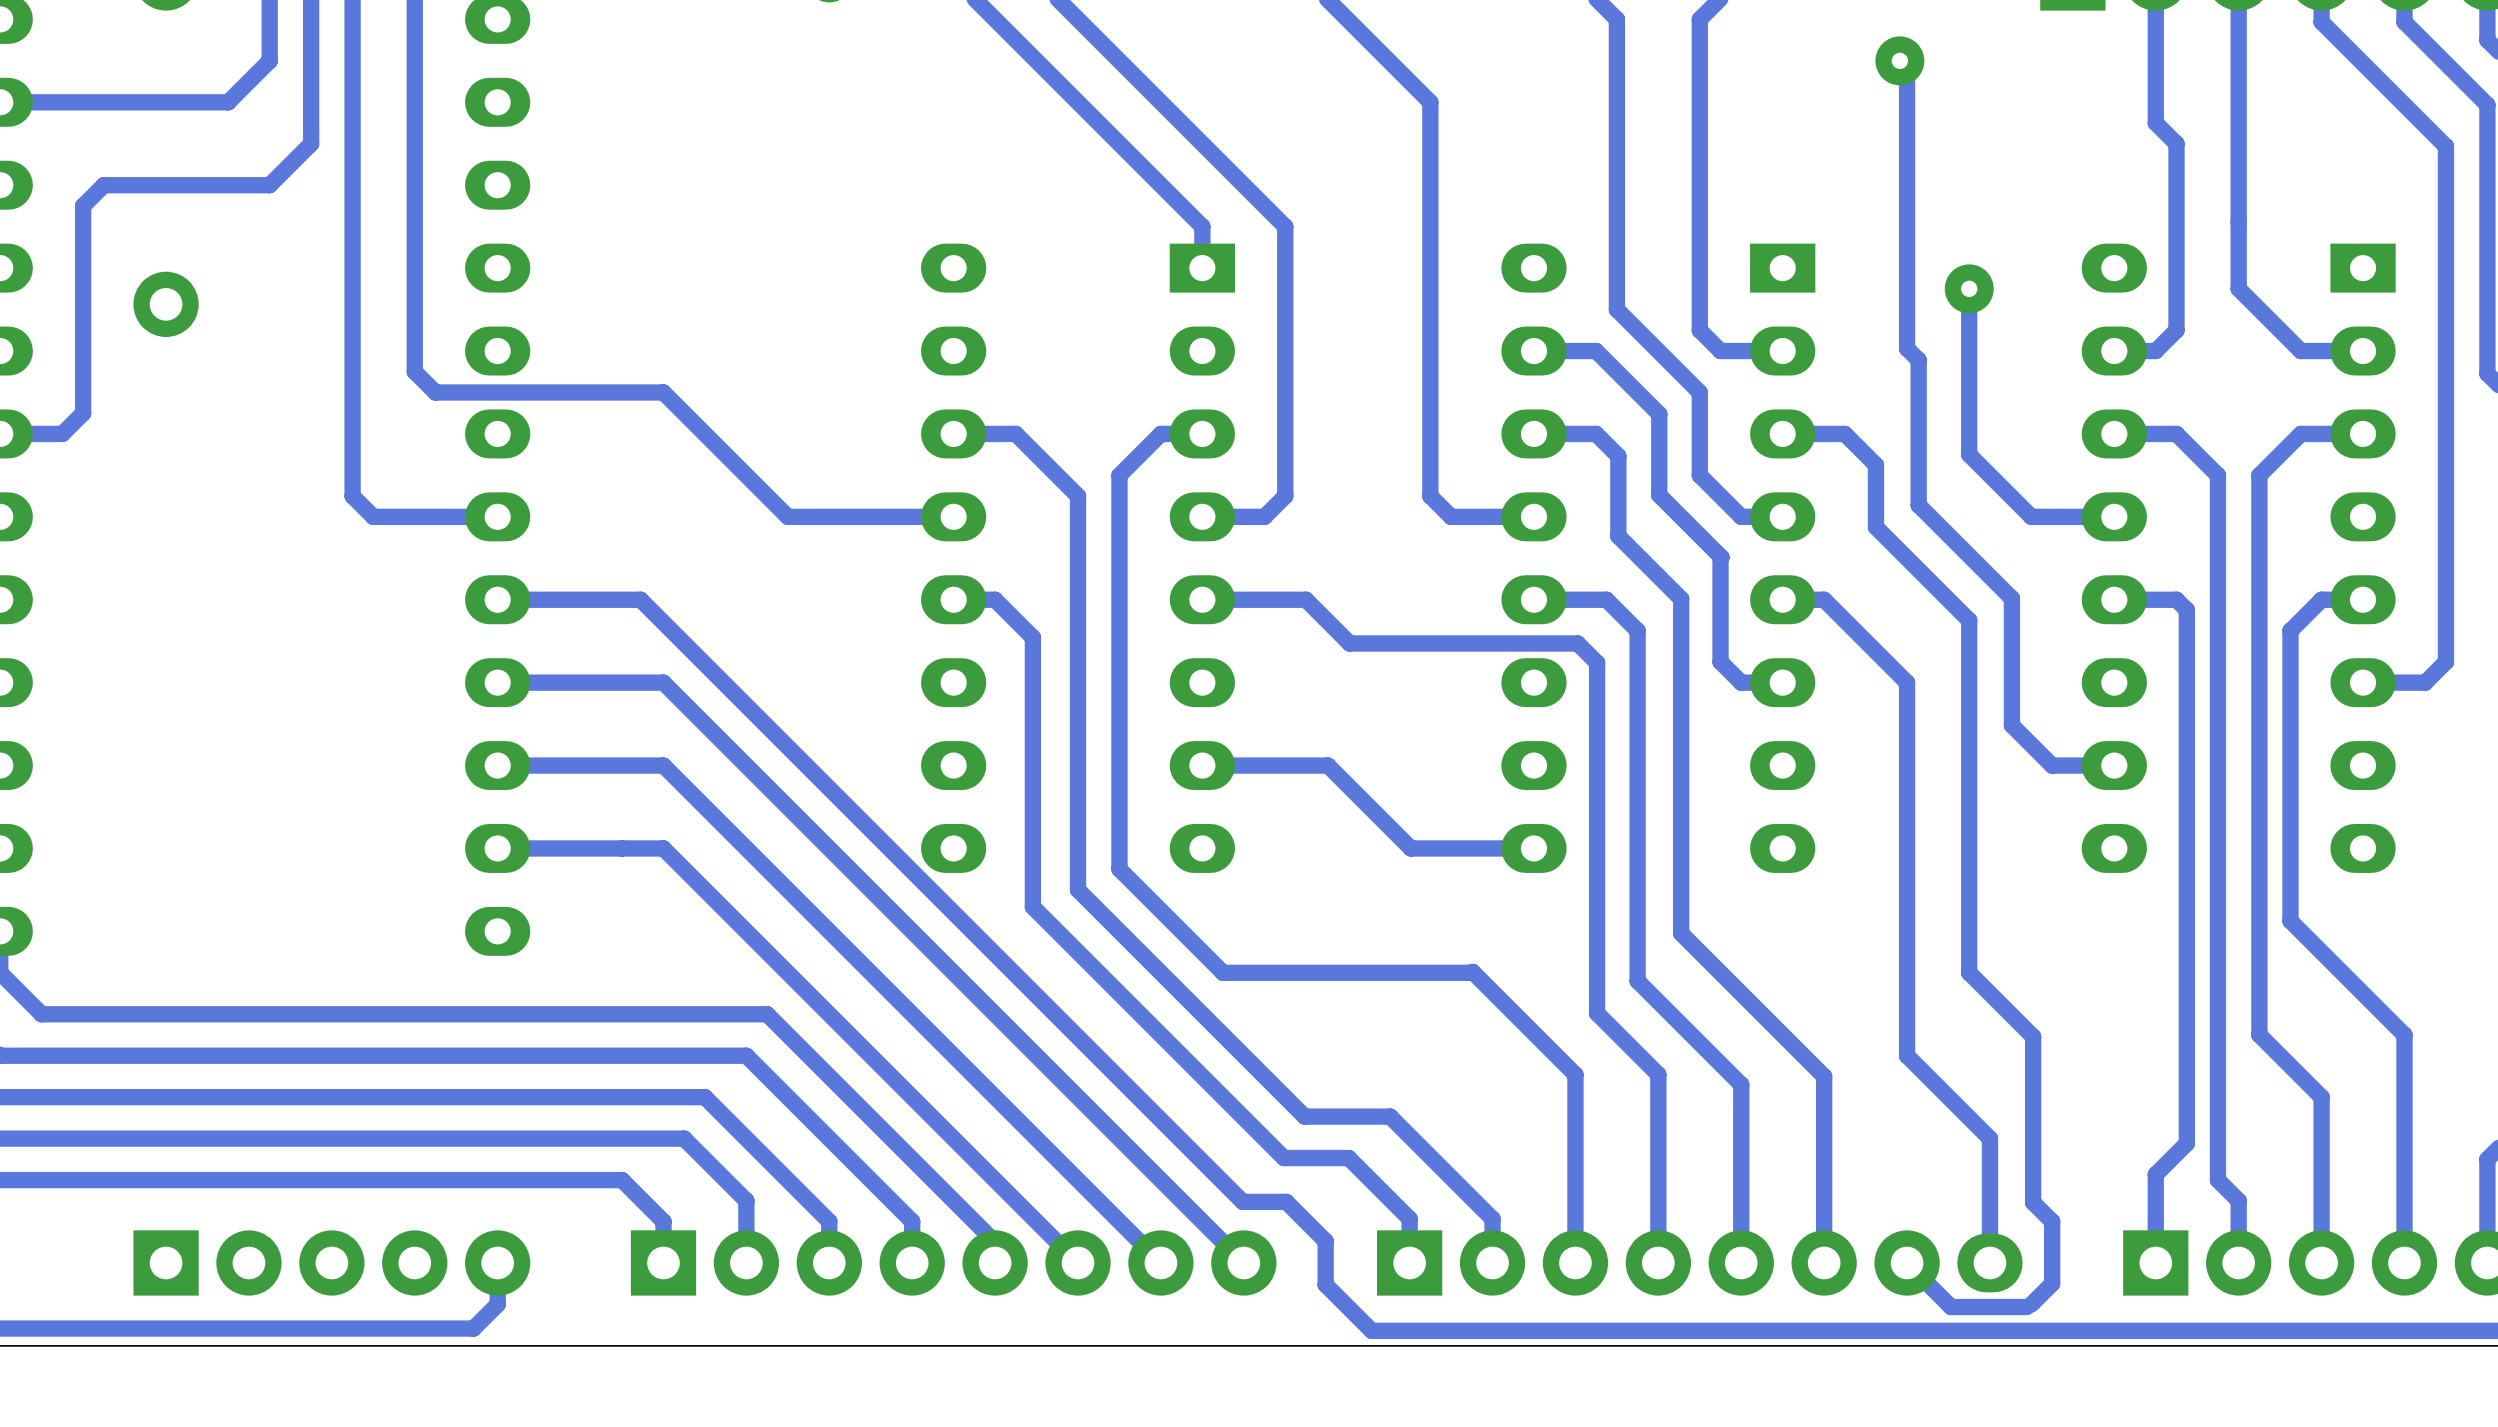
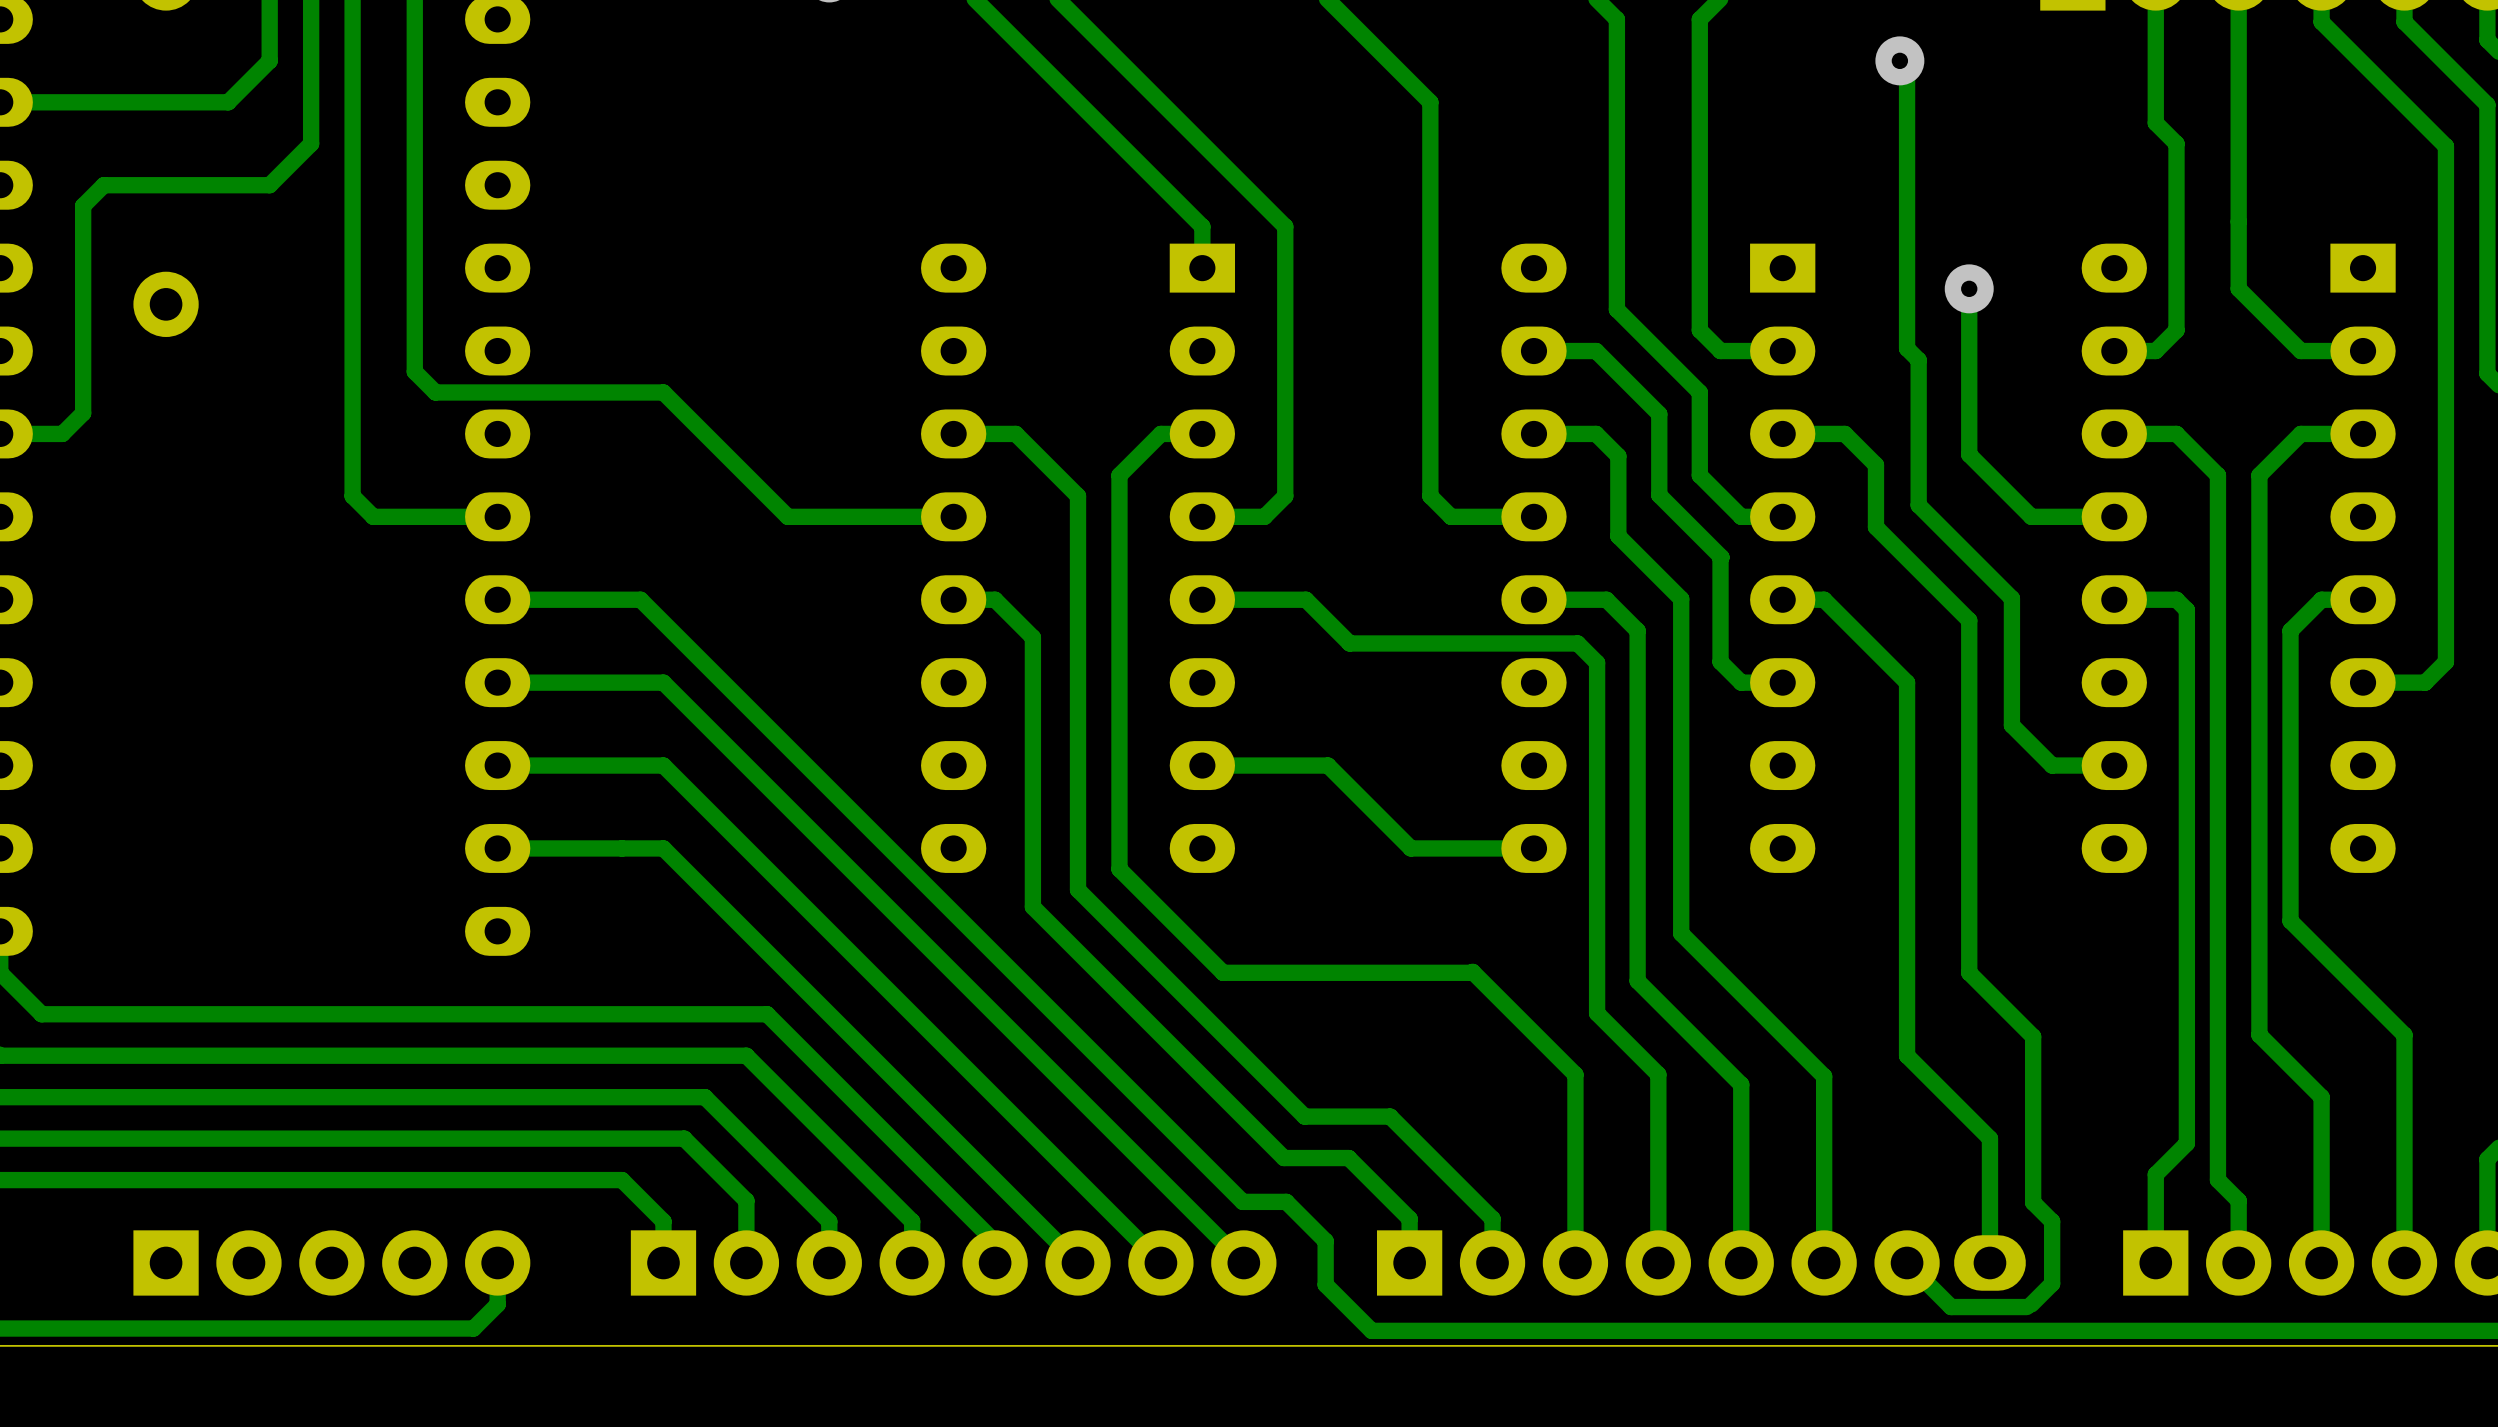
part footprint: [1376, 1230, 2023, 1296] -> [1376, 1230, 2026, 1296]

